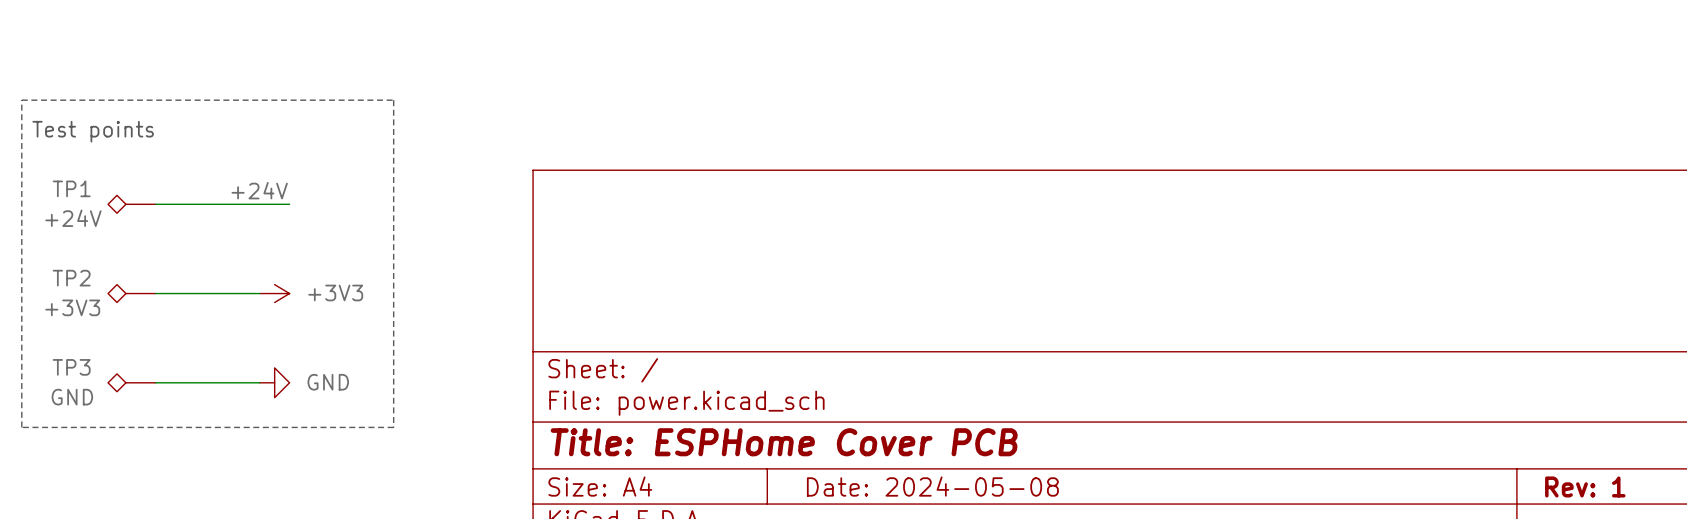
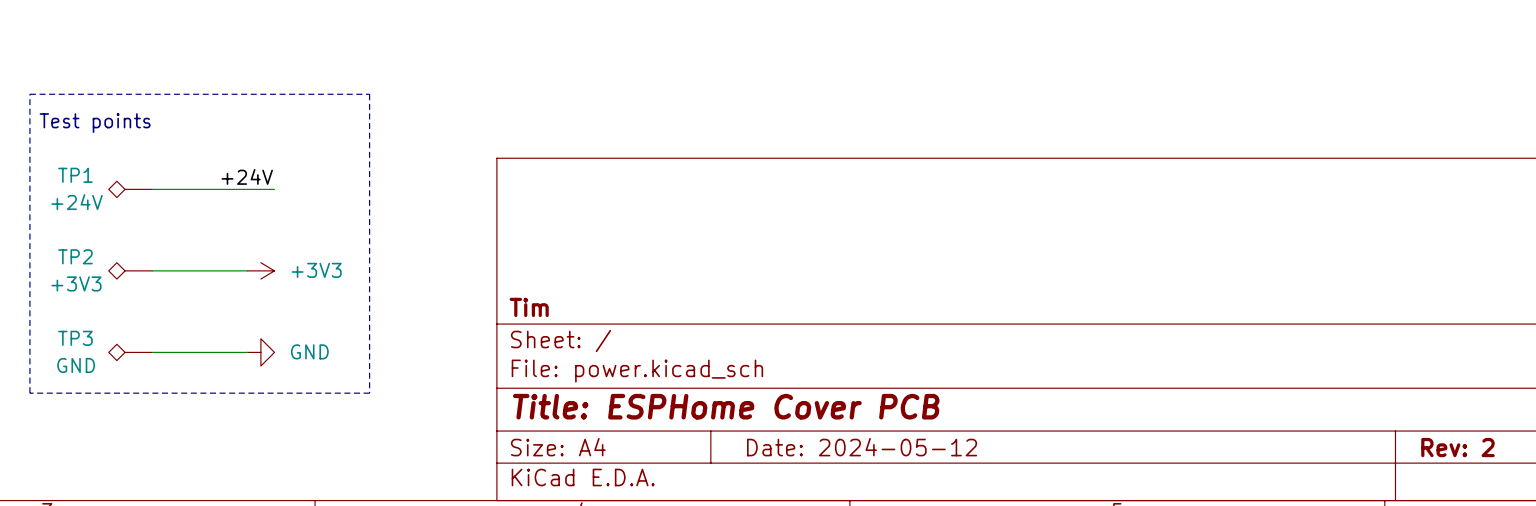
title block: none -> Tim (529, 307)
title block: Date: 2024-05-08 (932, 486) -> Date: 2024-05-12 (862, 447)
title block: Rev: 1 (1585, 486) -> Rev: 2 (1457, 447)

